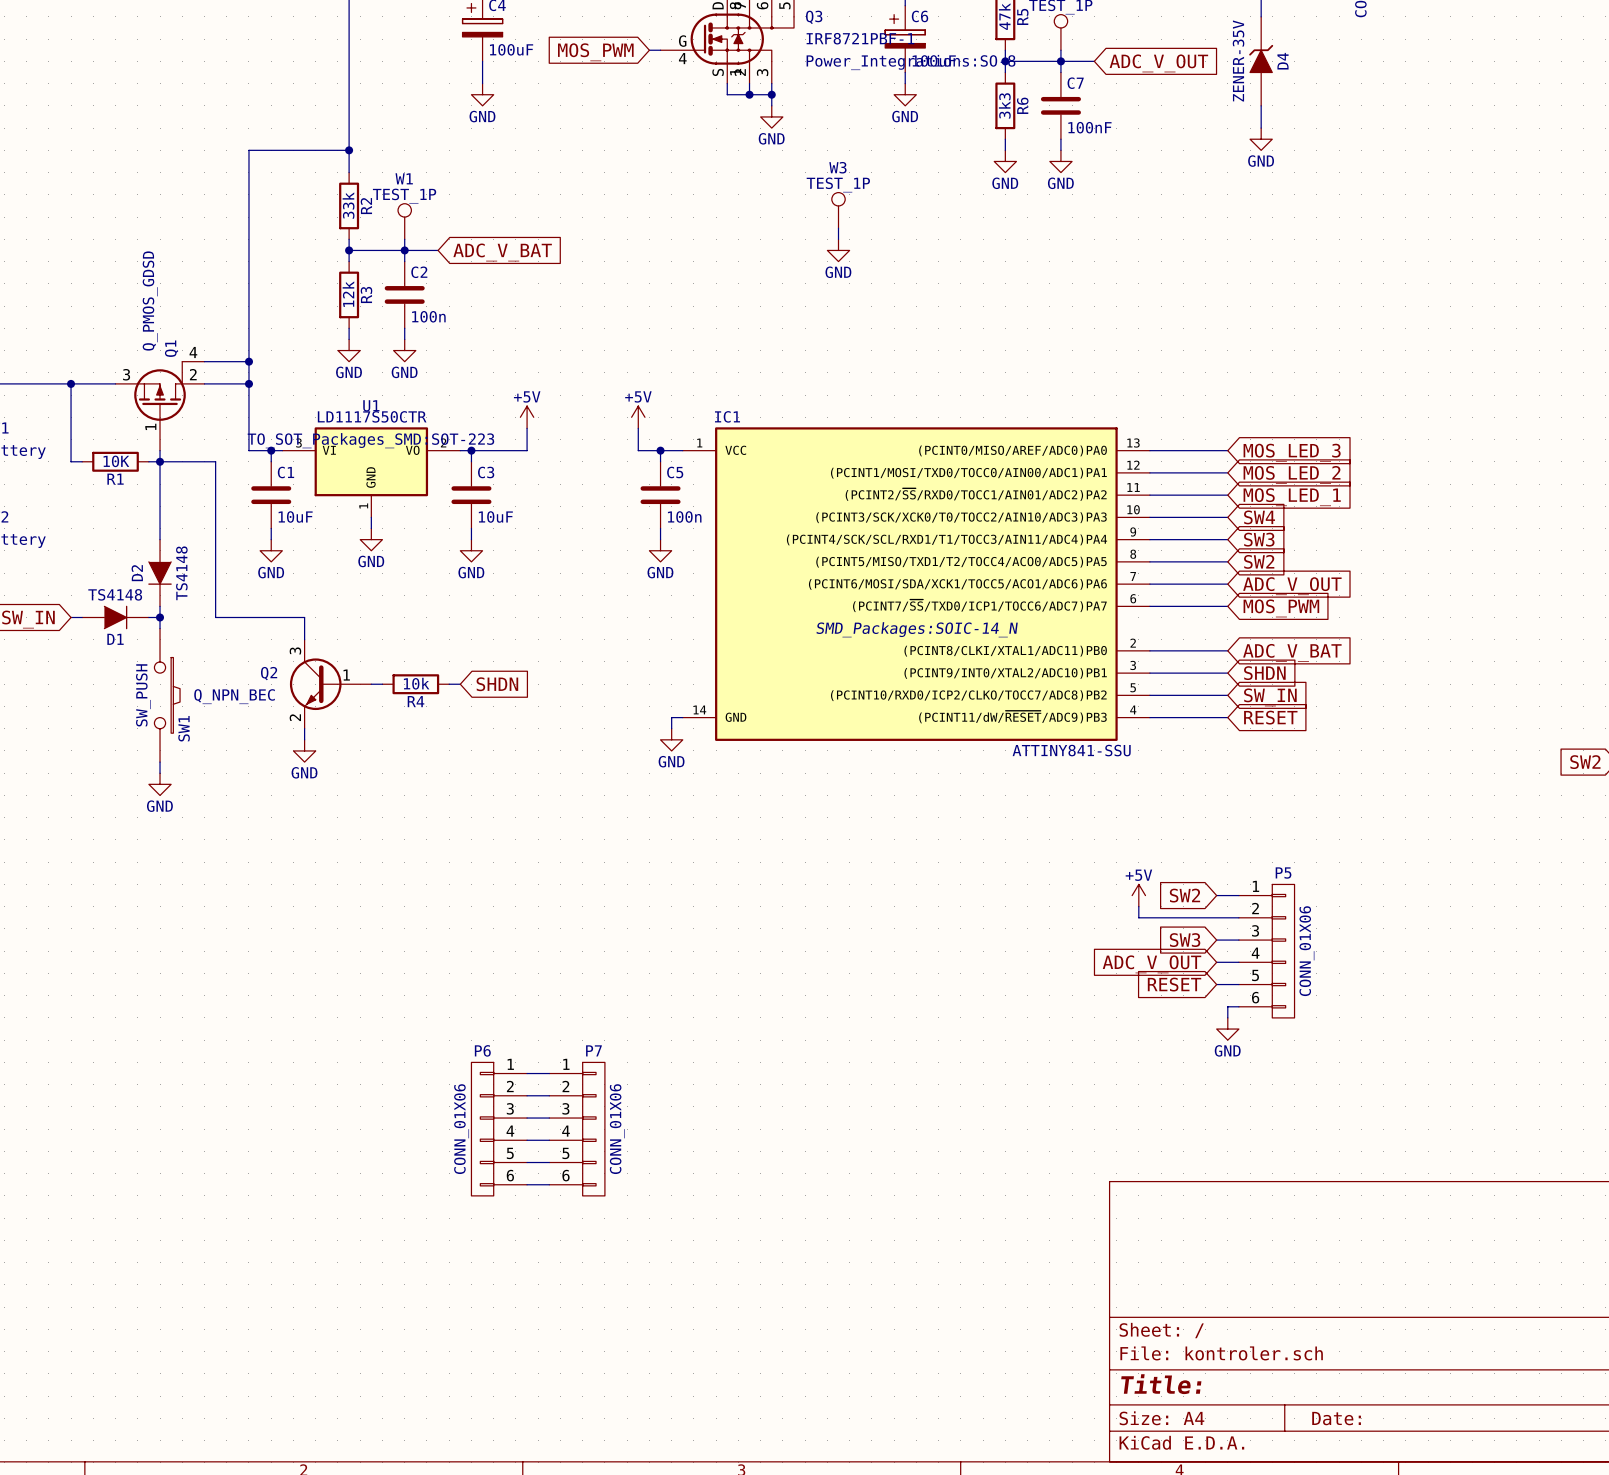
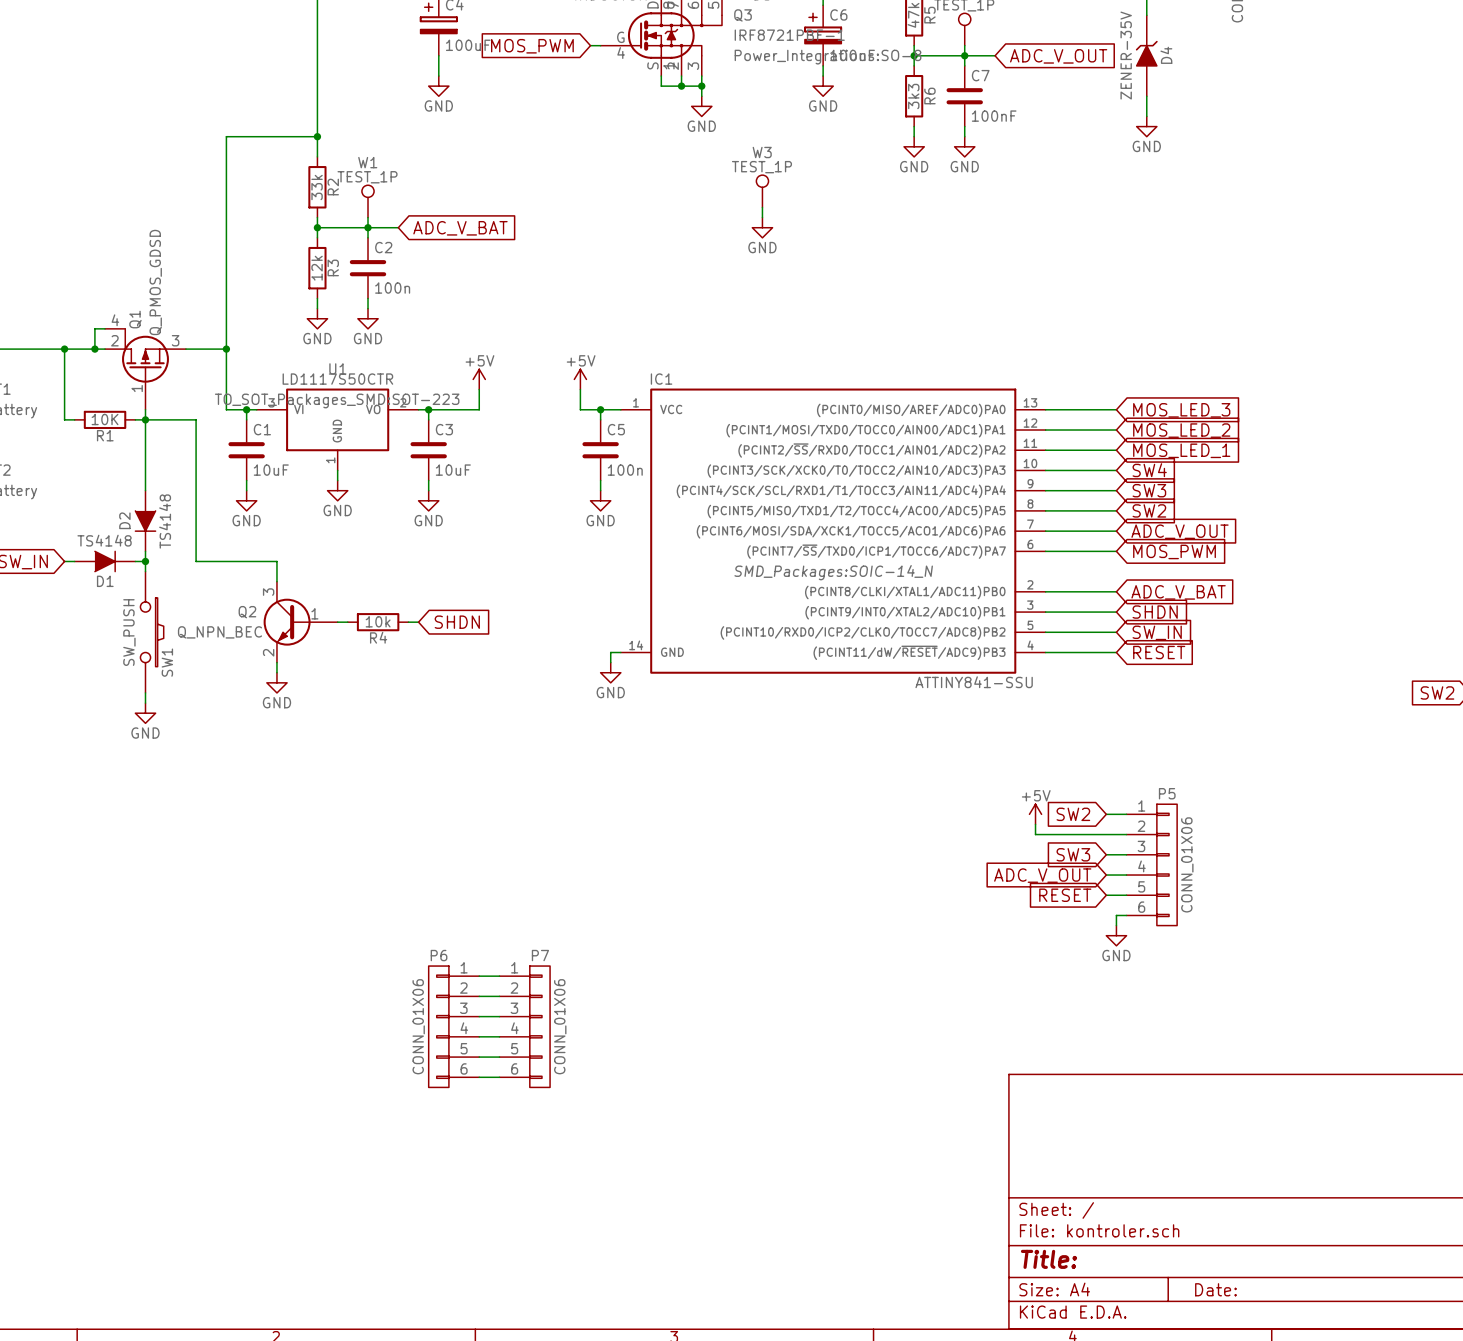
wire: none -> (105, 328) (94, 328) (94, 349)
wire: (204, 361) (248, 361) -> none
junction: (248, 361) -> none
junction: none -> (94, 349)
Q1 flip: as is (160, 391) -> left-right (145, 355)

